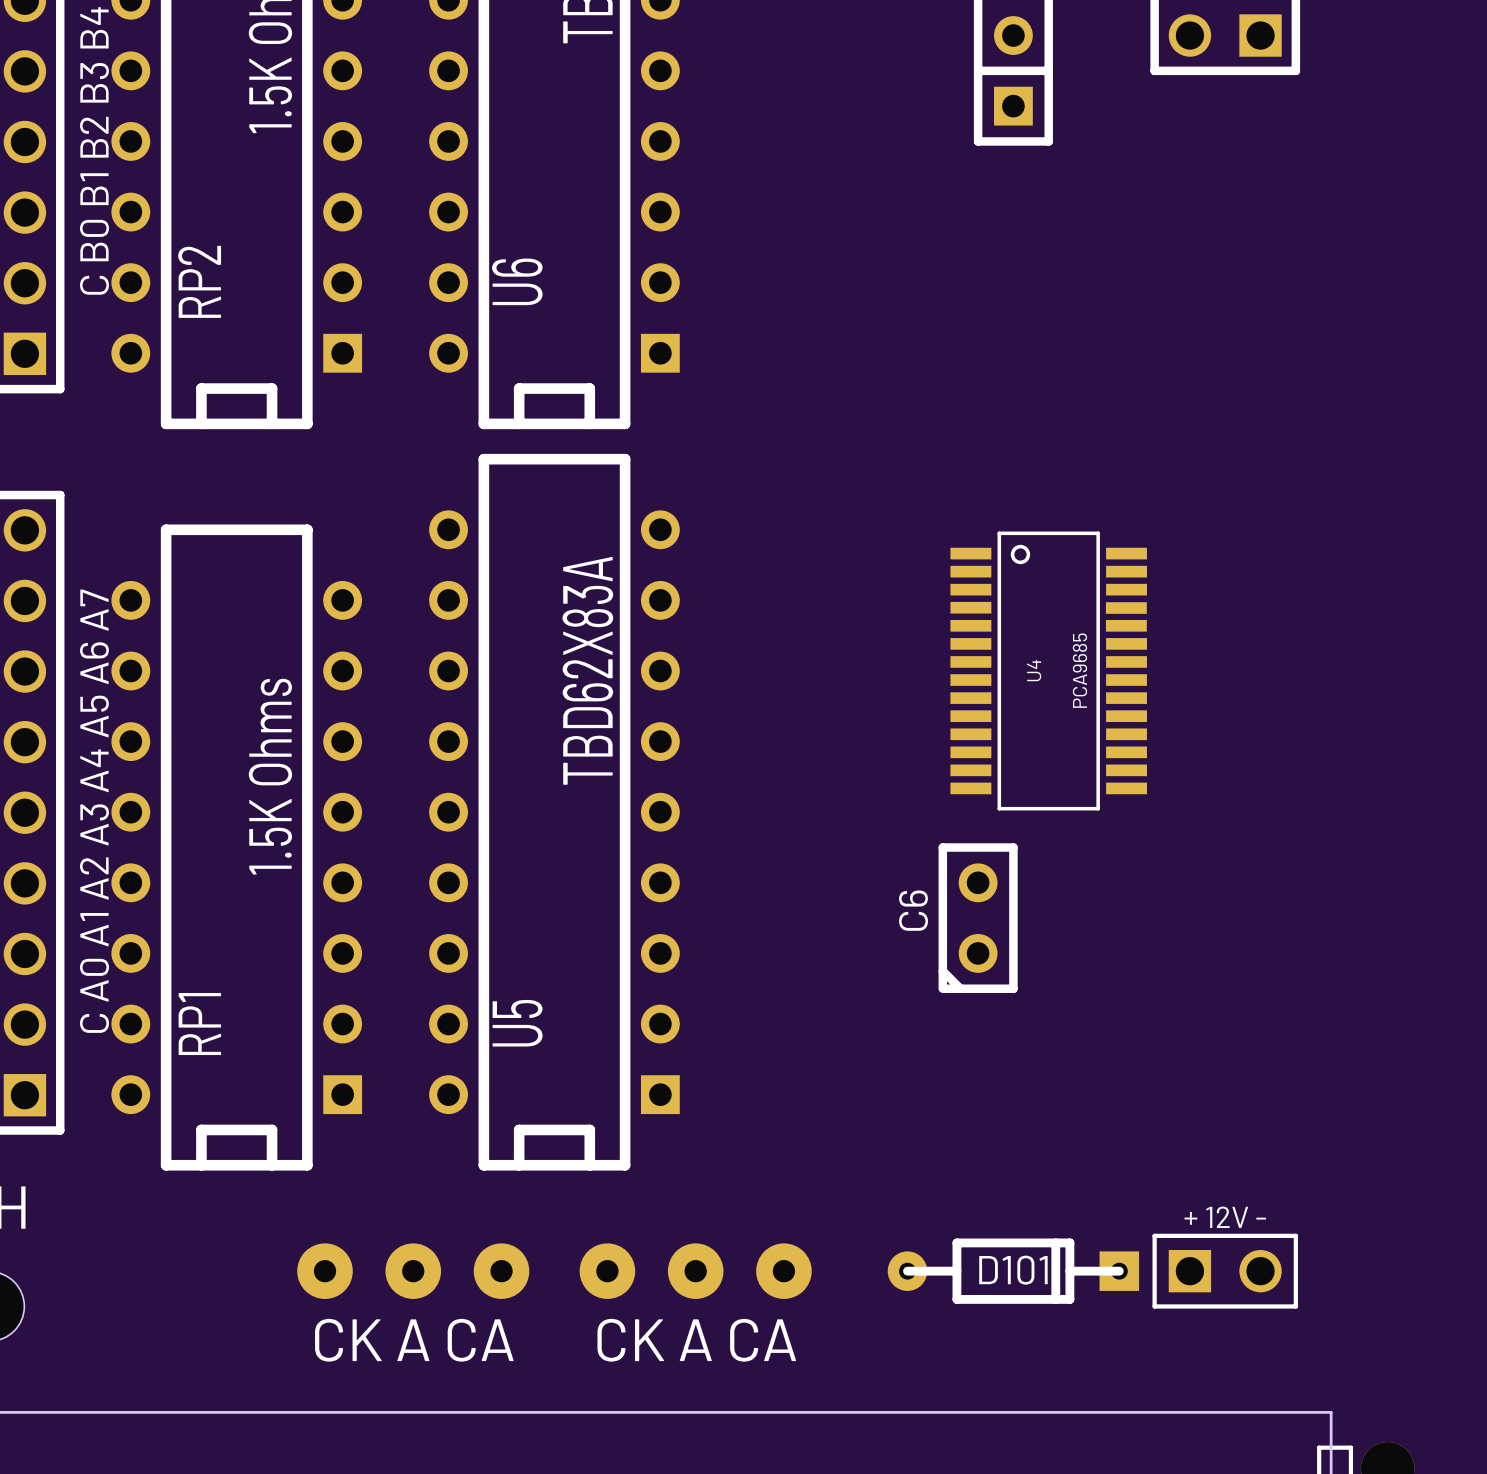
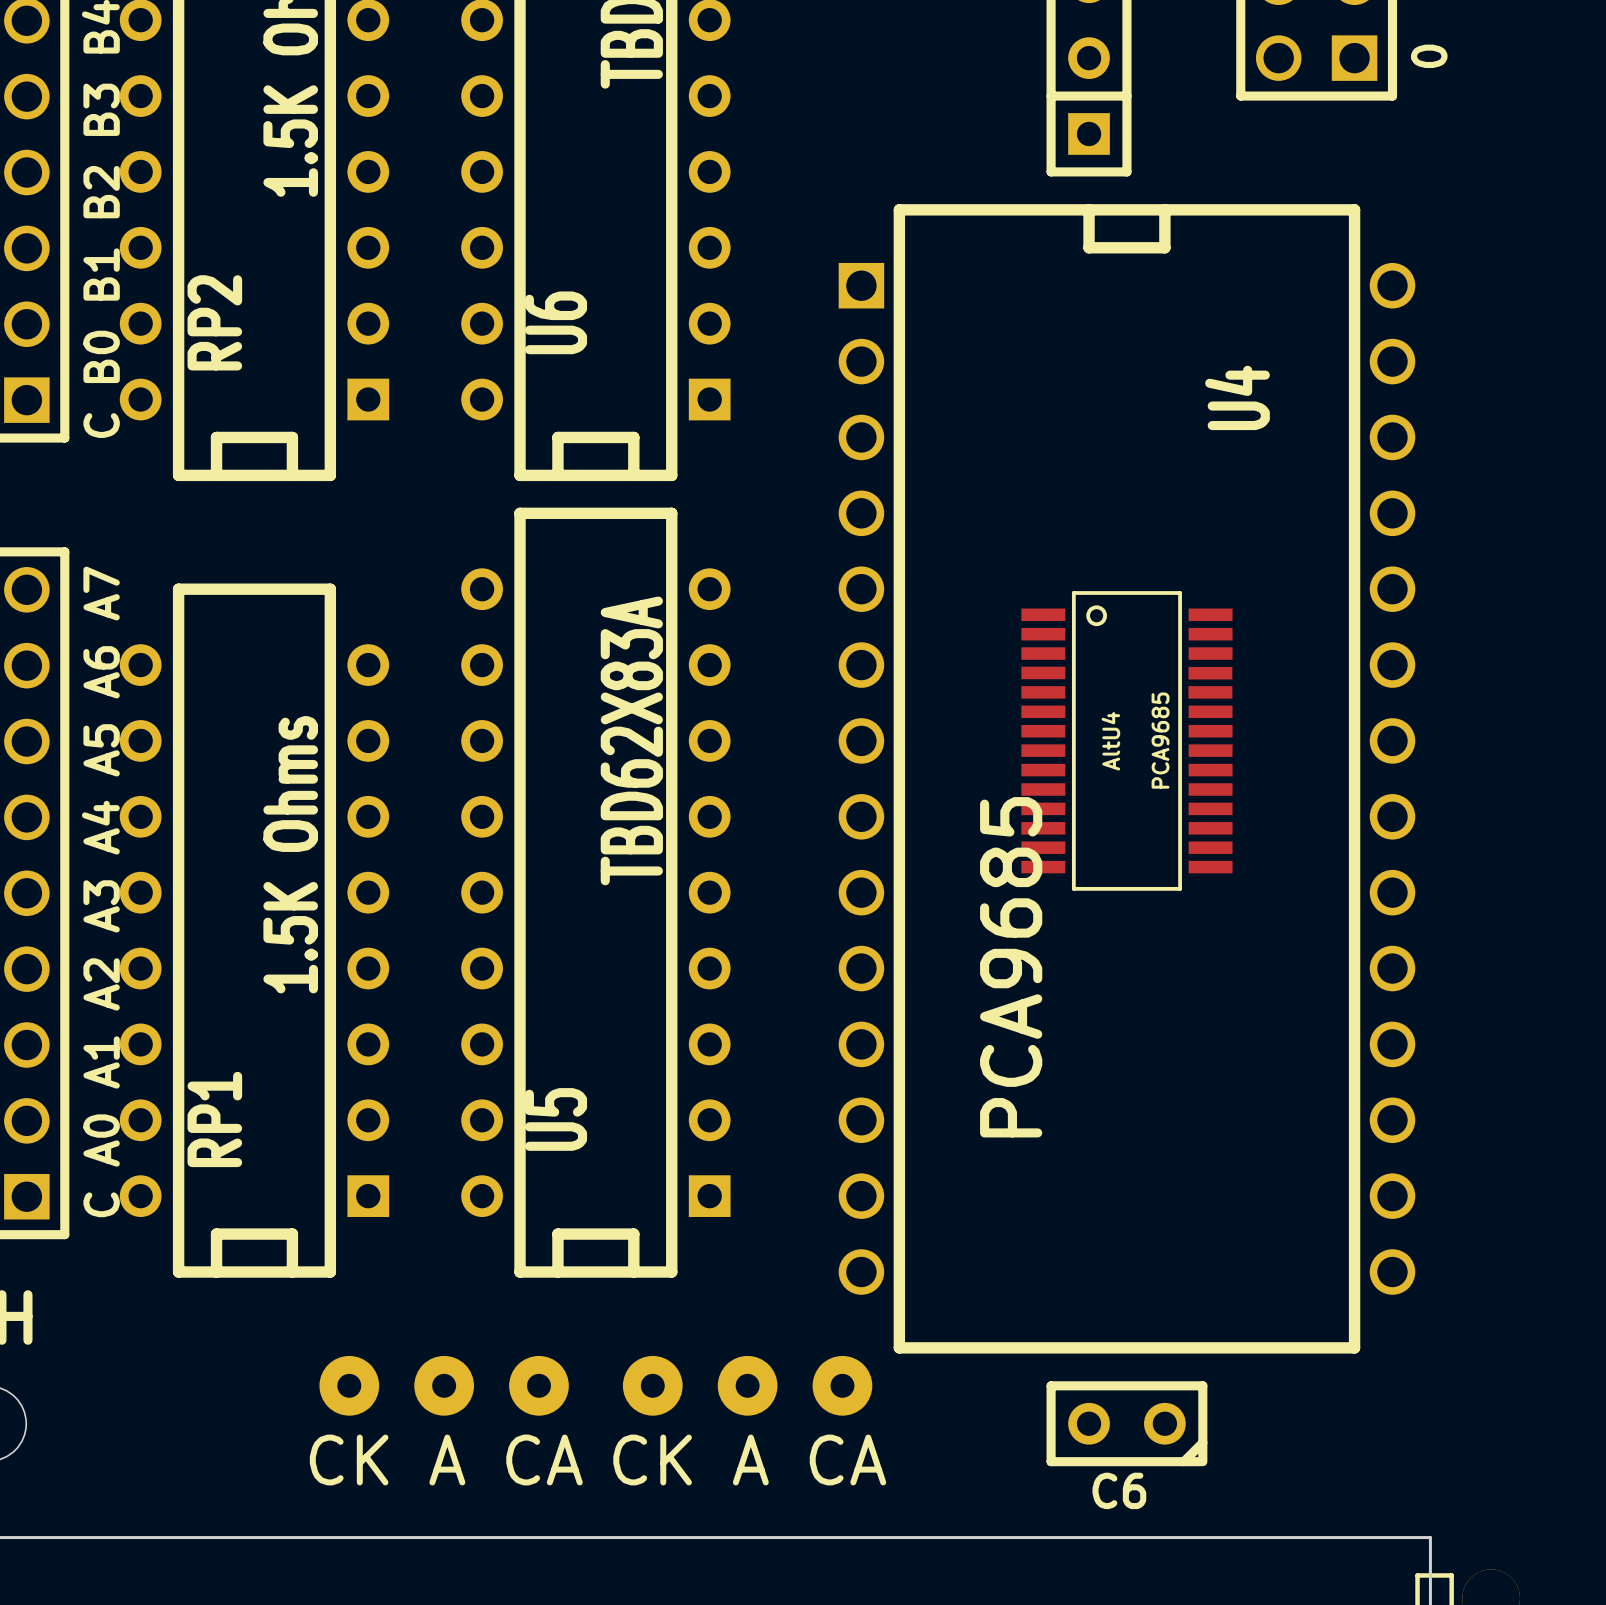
U4 name: U4 (1034, 670) -> AltU4 (1110, 741)
U4: none -> PCA9685 (1126, 778)
C6 rotation: 0° (978, 918) -> 90° counterclockwise (1126, 1423)
C6 position: (978, 918) -> (1126, 1423)
D101: (1013, 1271) -> none
part: + 12V - (1225, 1271) -> none

